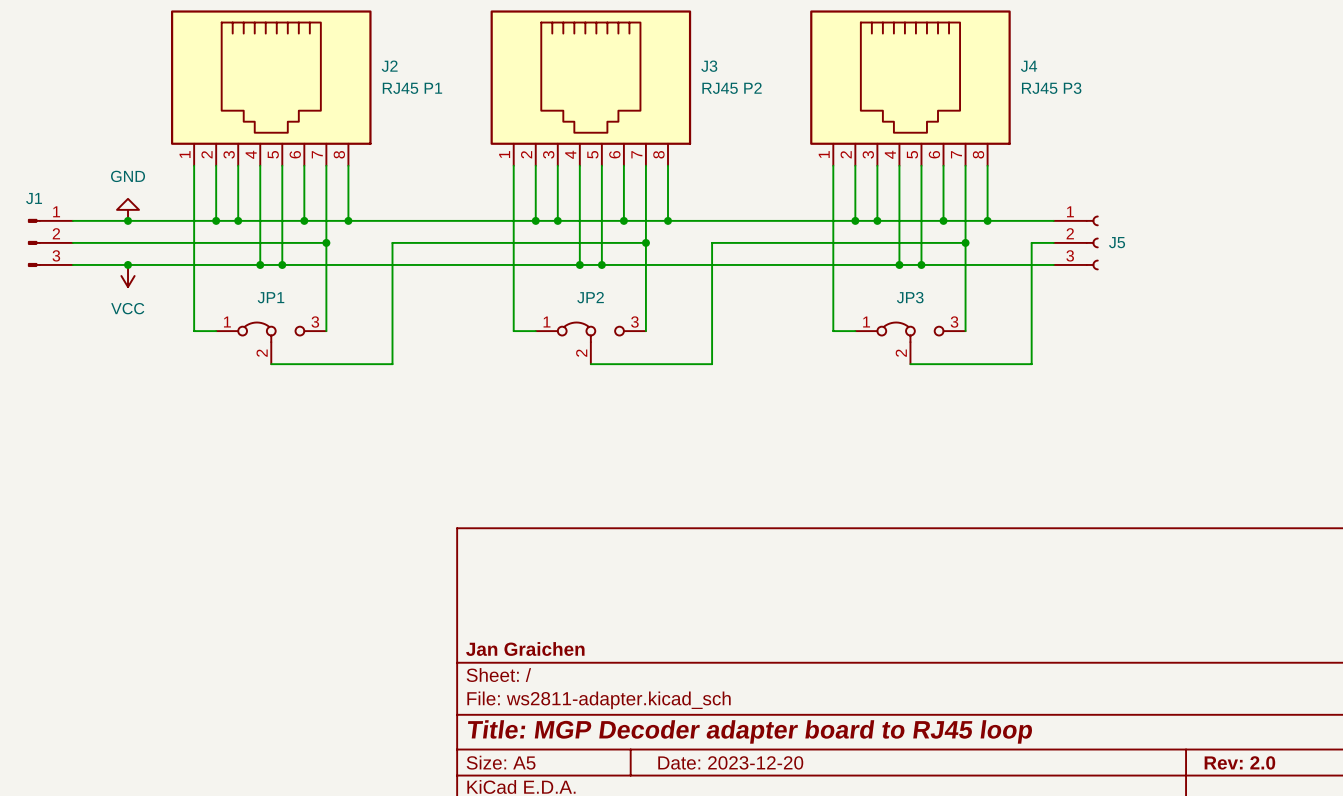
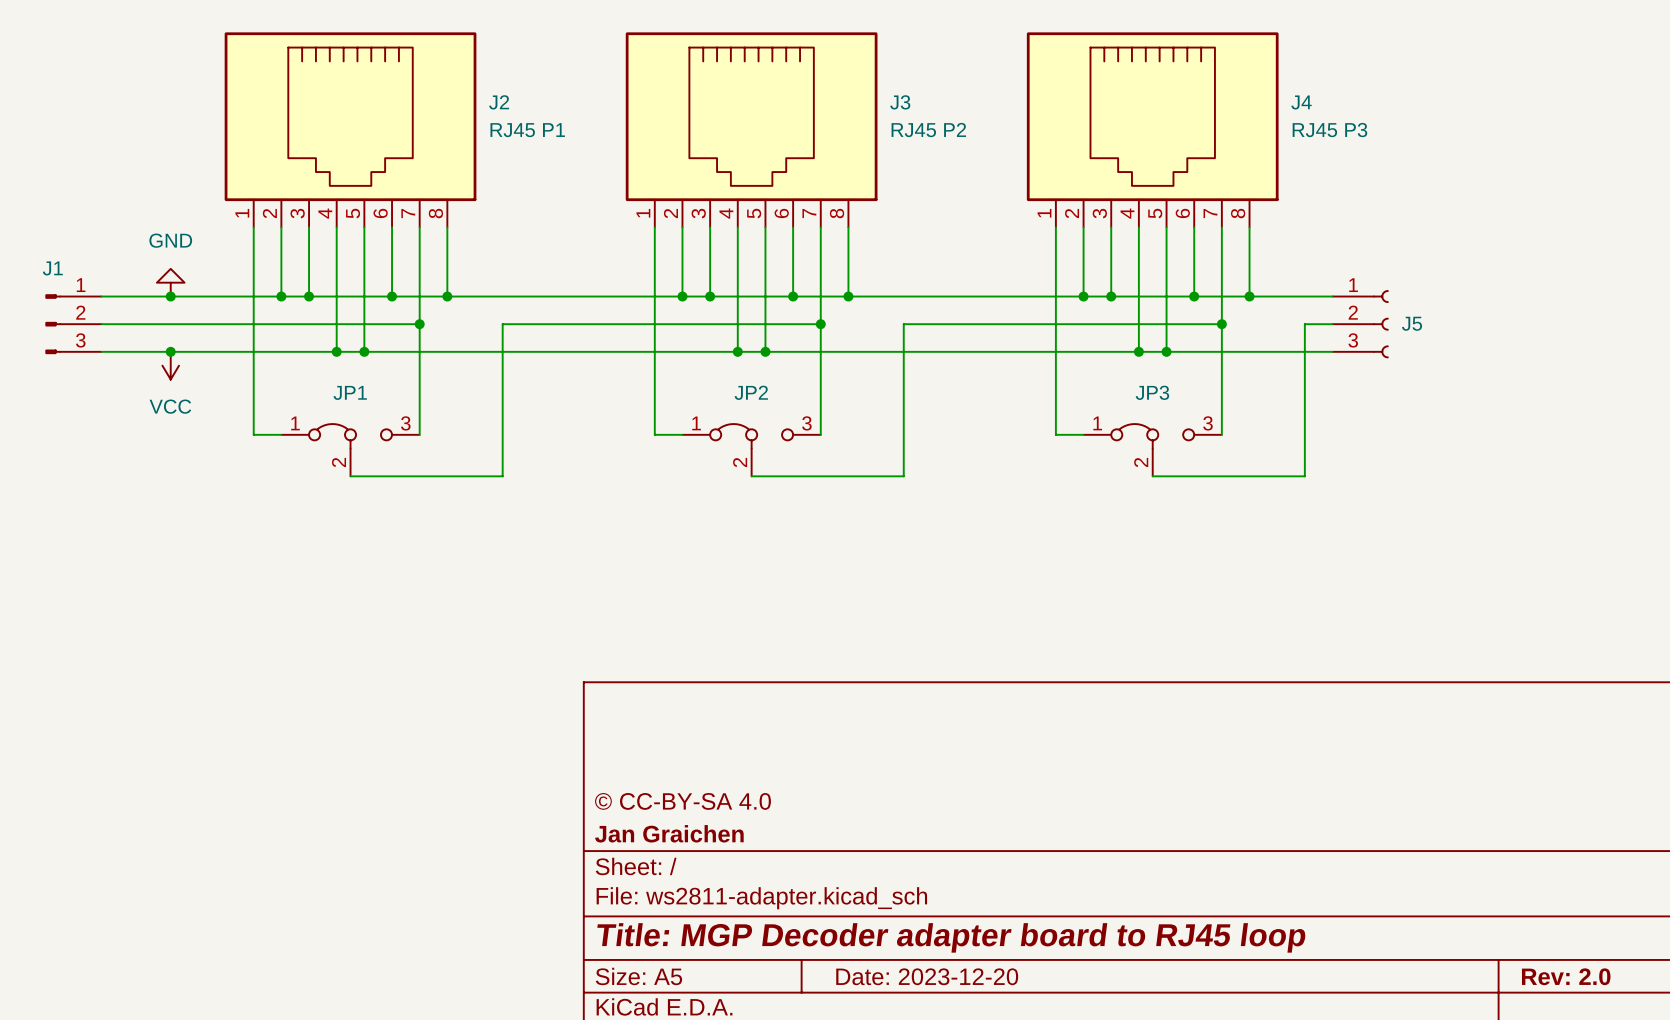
title block: none -> © CC-BY-SA 4.0 (682, 801)

